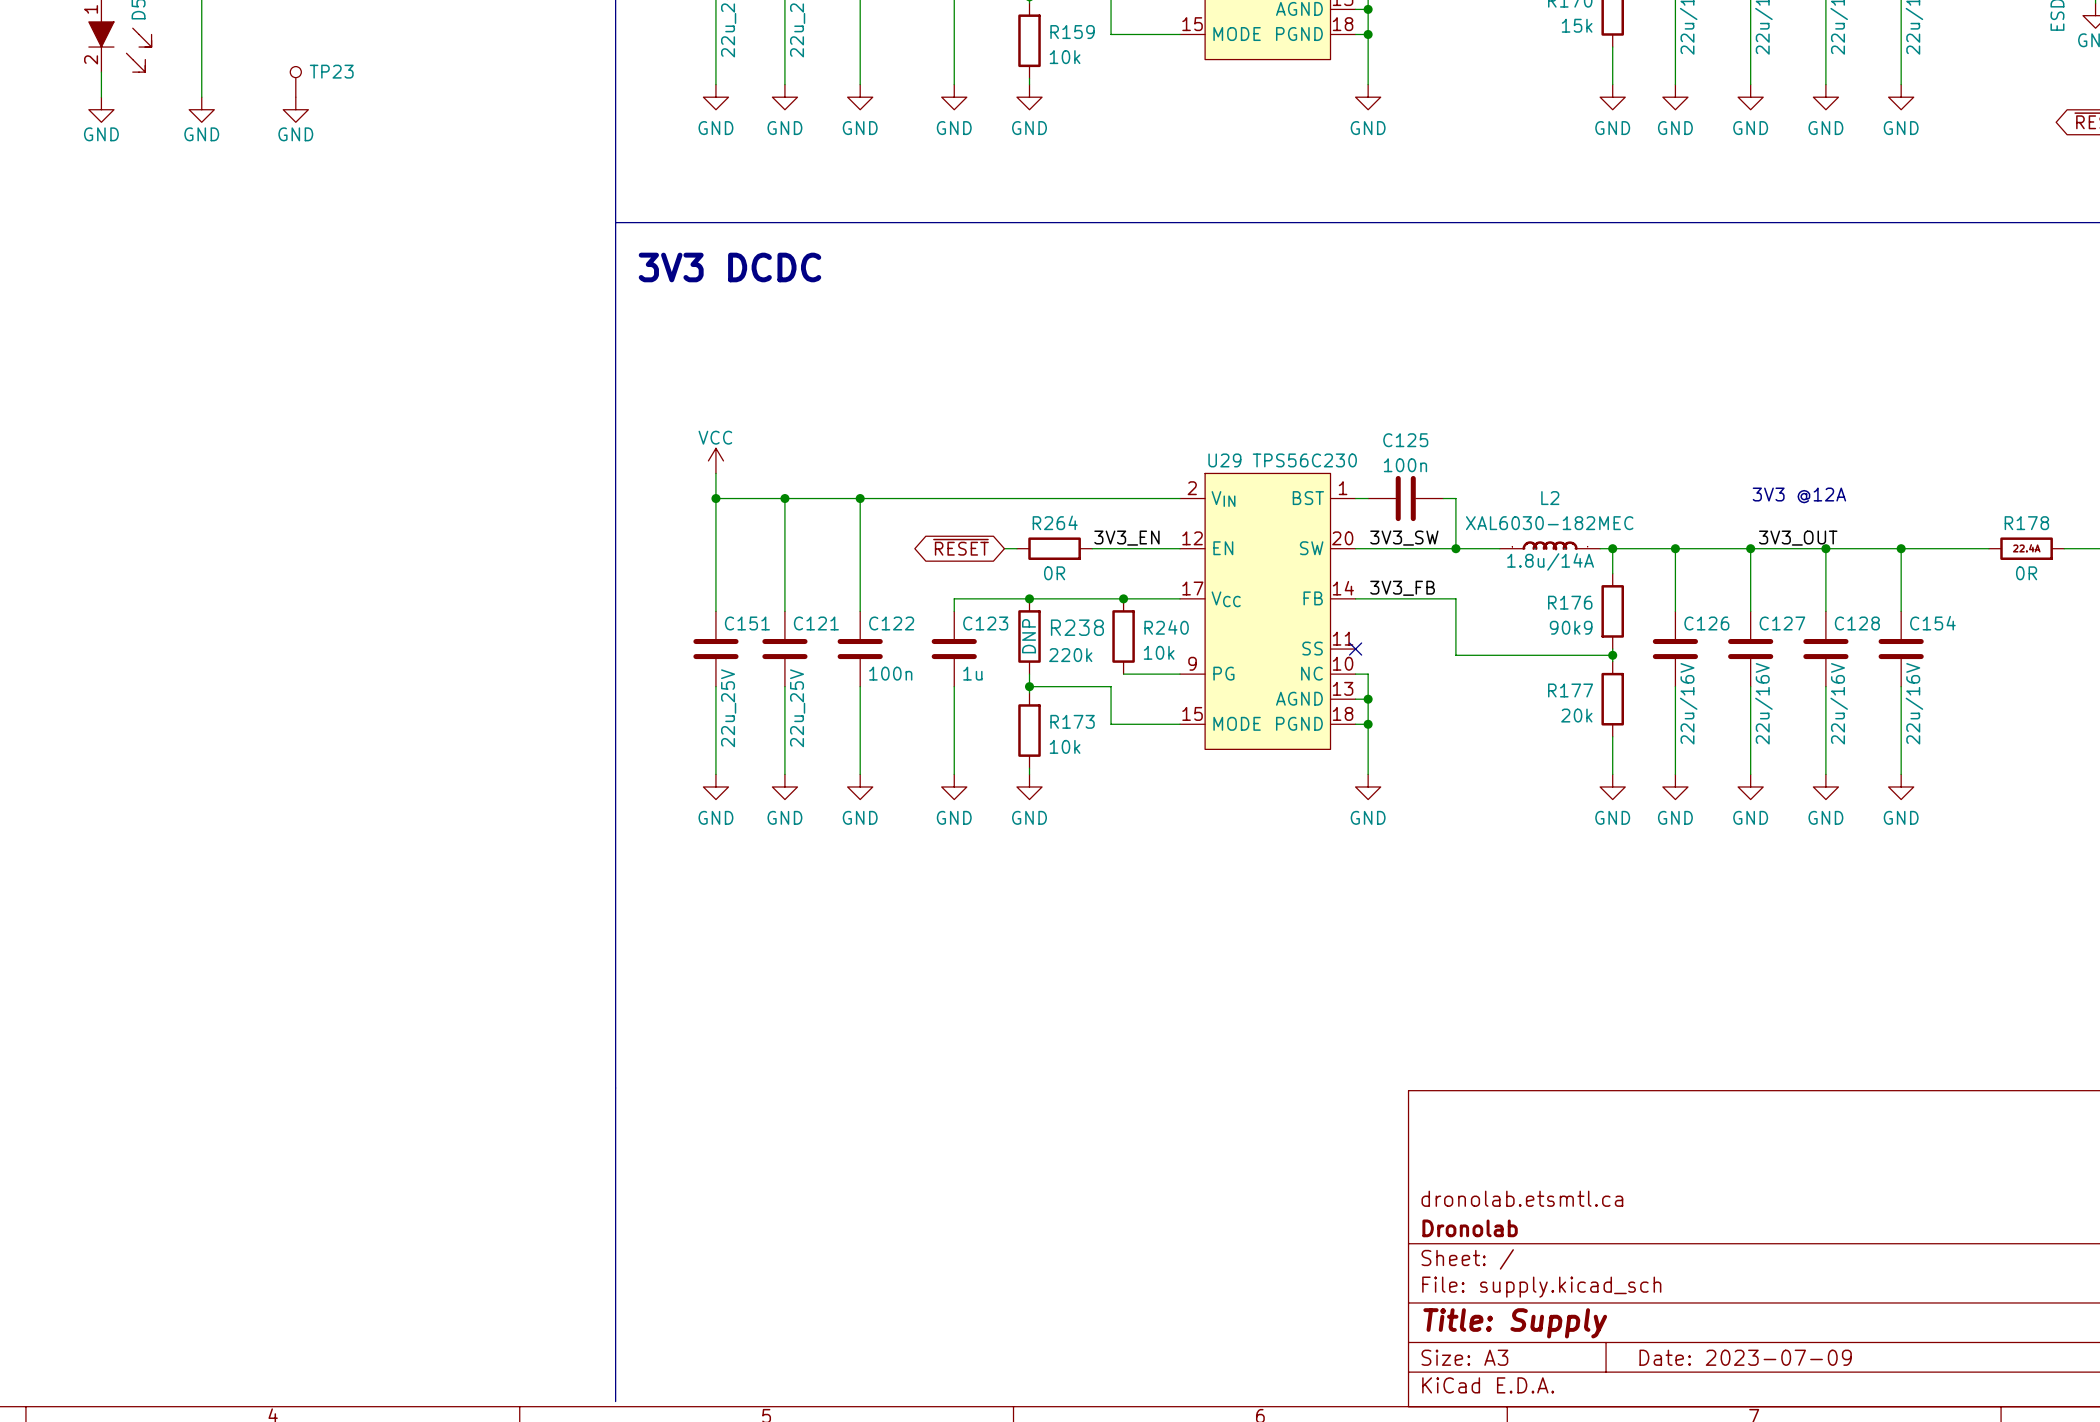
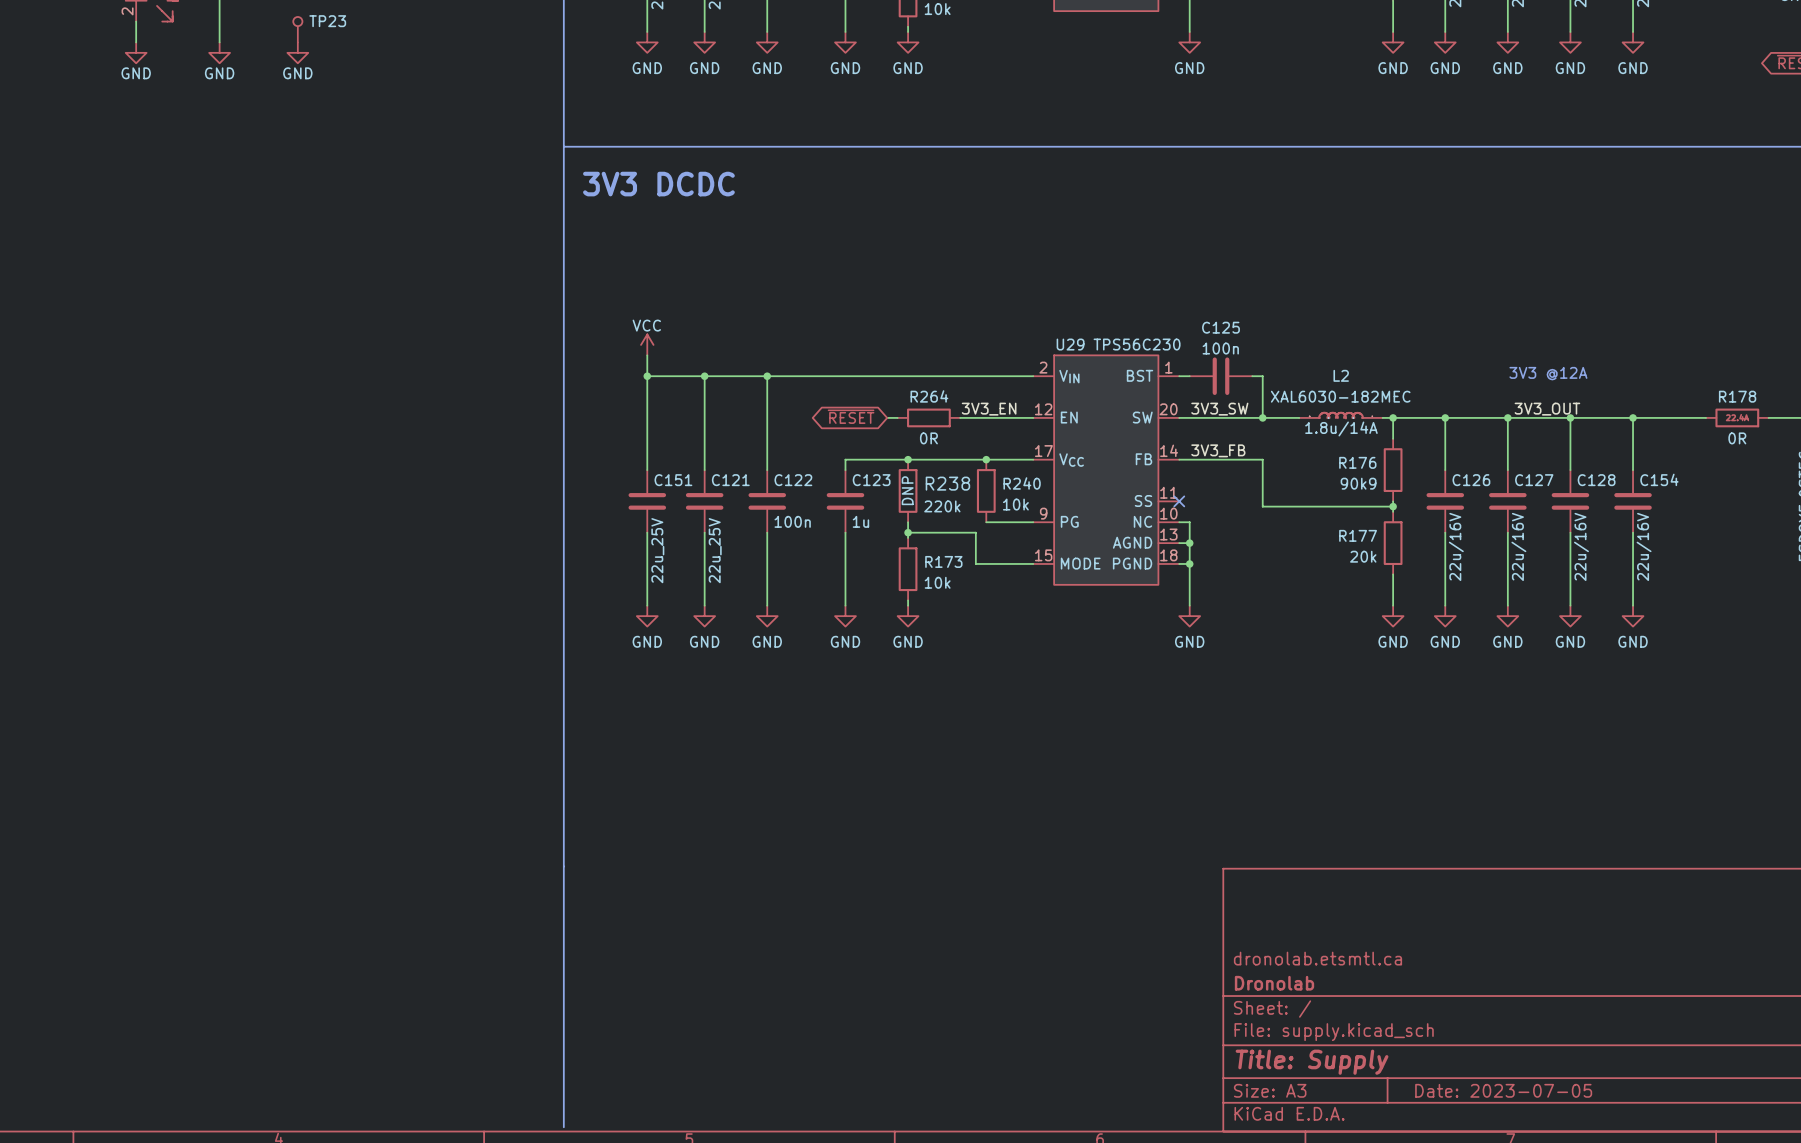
title block: Date: 2023-07-09 (1745, 1357) -> Date: 2023-07-05 (1503, 1090)

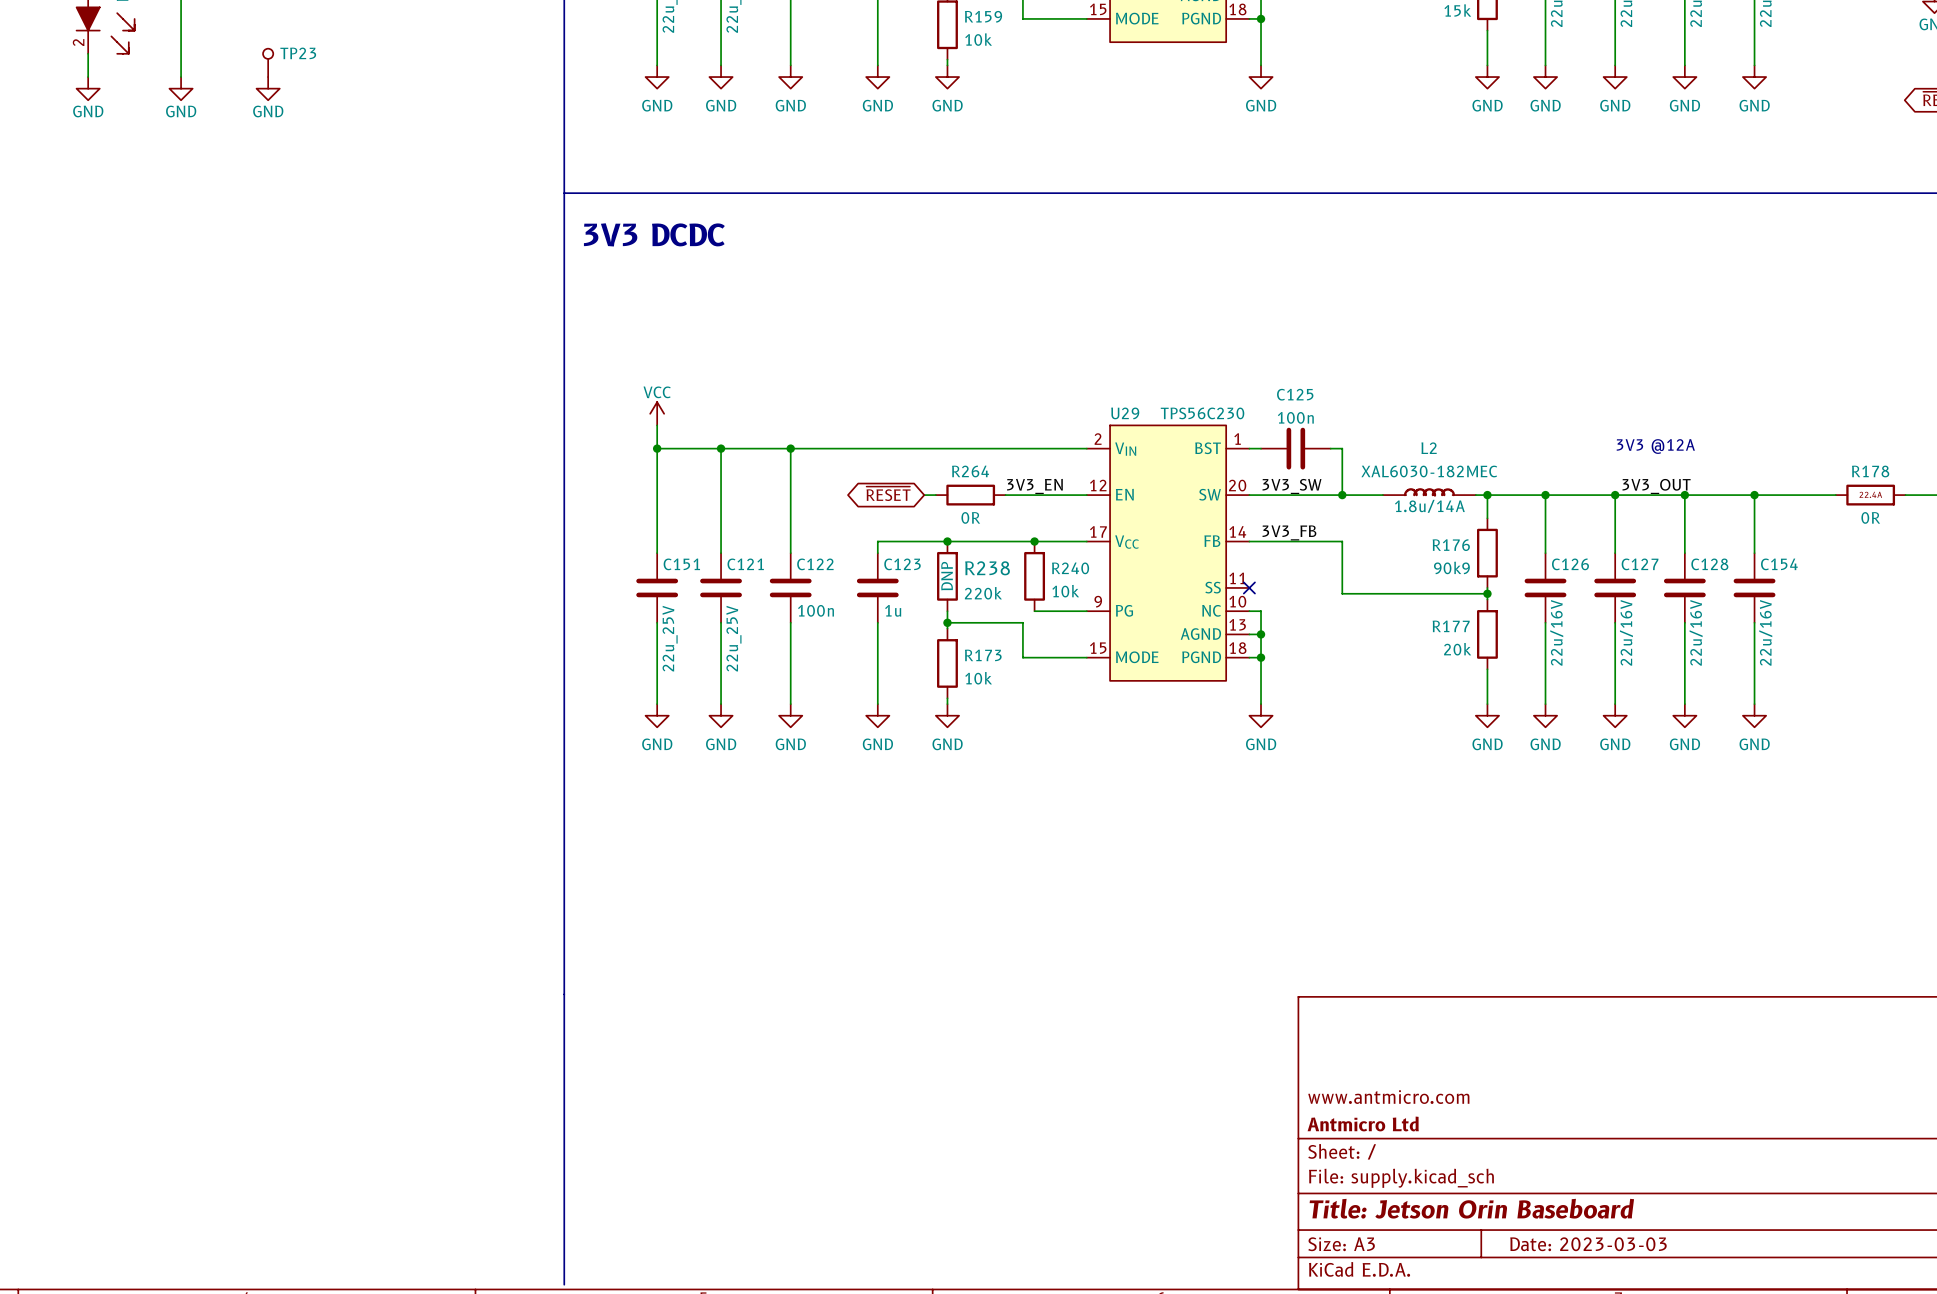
title block: dronolab.etsmtl.ca (1317, 958) -> www.antmicro.com (1388, 1097)
title block: Dronolab (1274, 983) -> Antmicro Ltd (1363, 1123)
title block: Title: Supply (1312, 1062) -> Title: Jetson Orin Baseboard (1471, 1208)
title block: Date: 2023-07-05 (1503, 1090) -> Date: 2023-03-03 (1588, 1244)

